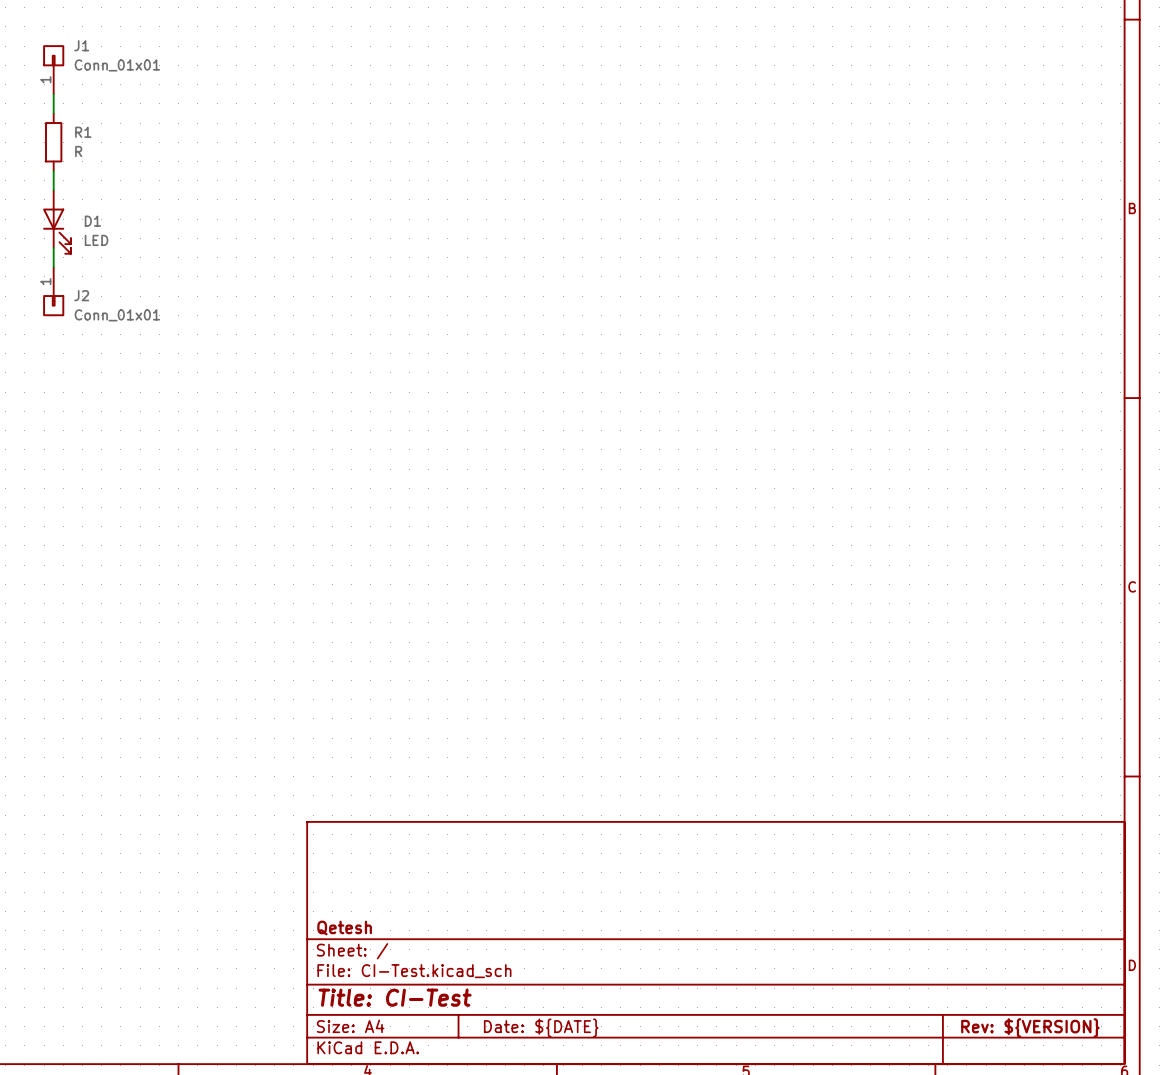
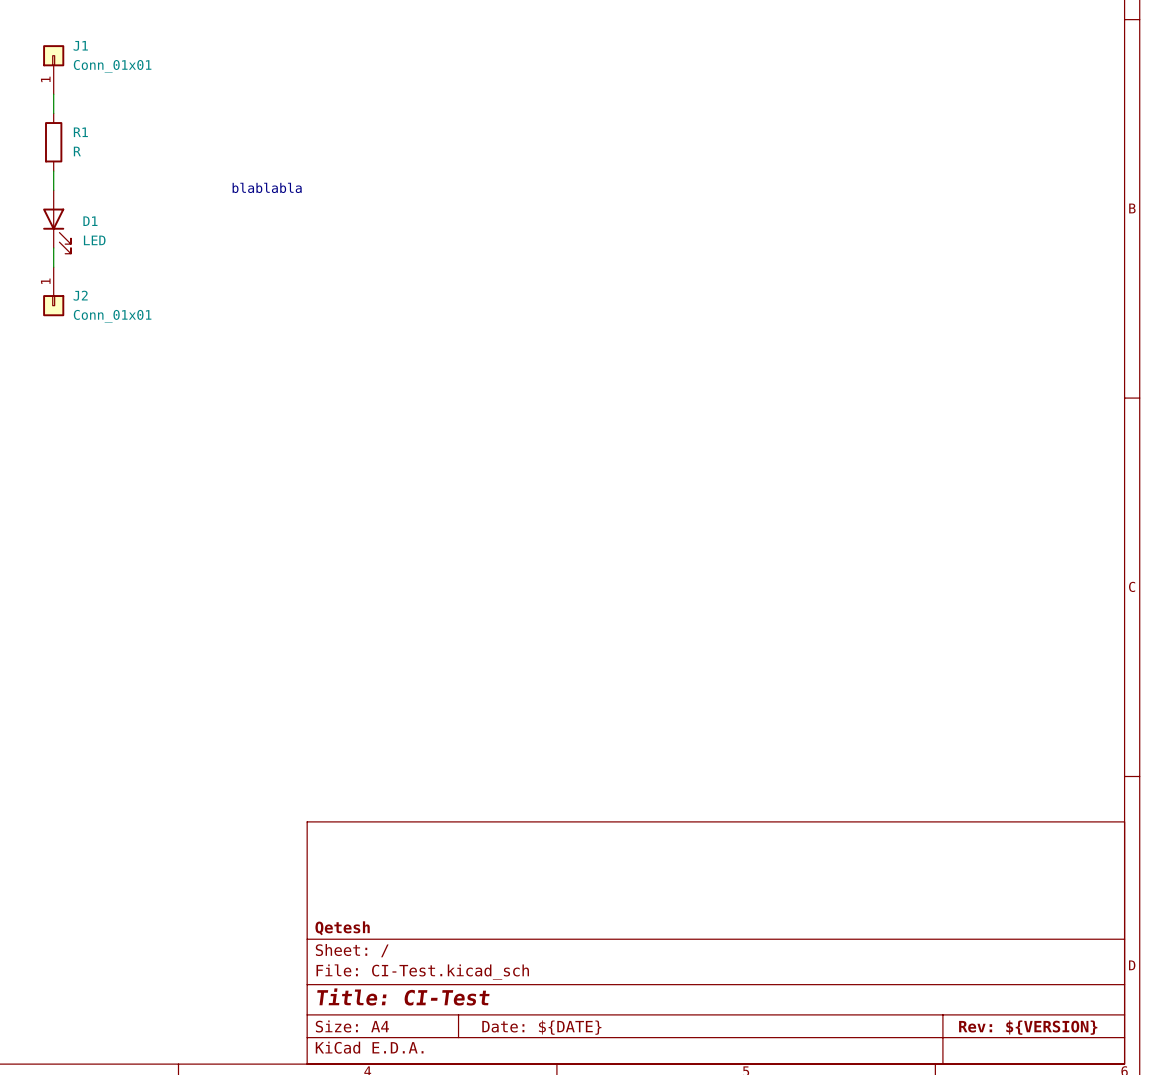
text: none -> blablabla (267, 187)

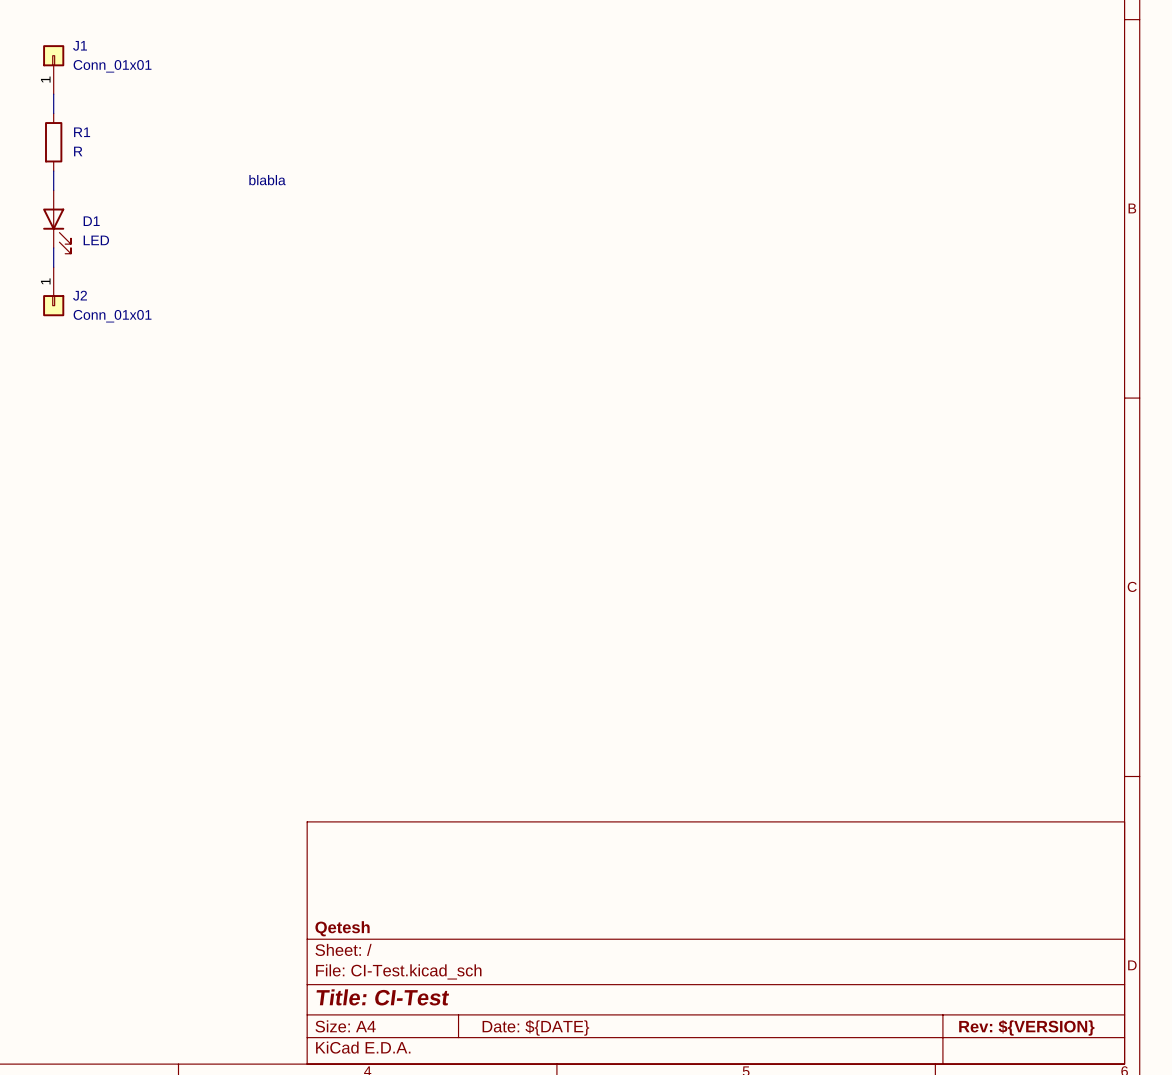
text: blablabla (267, 187) -> blabla (267, 180)

